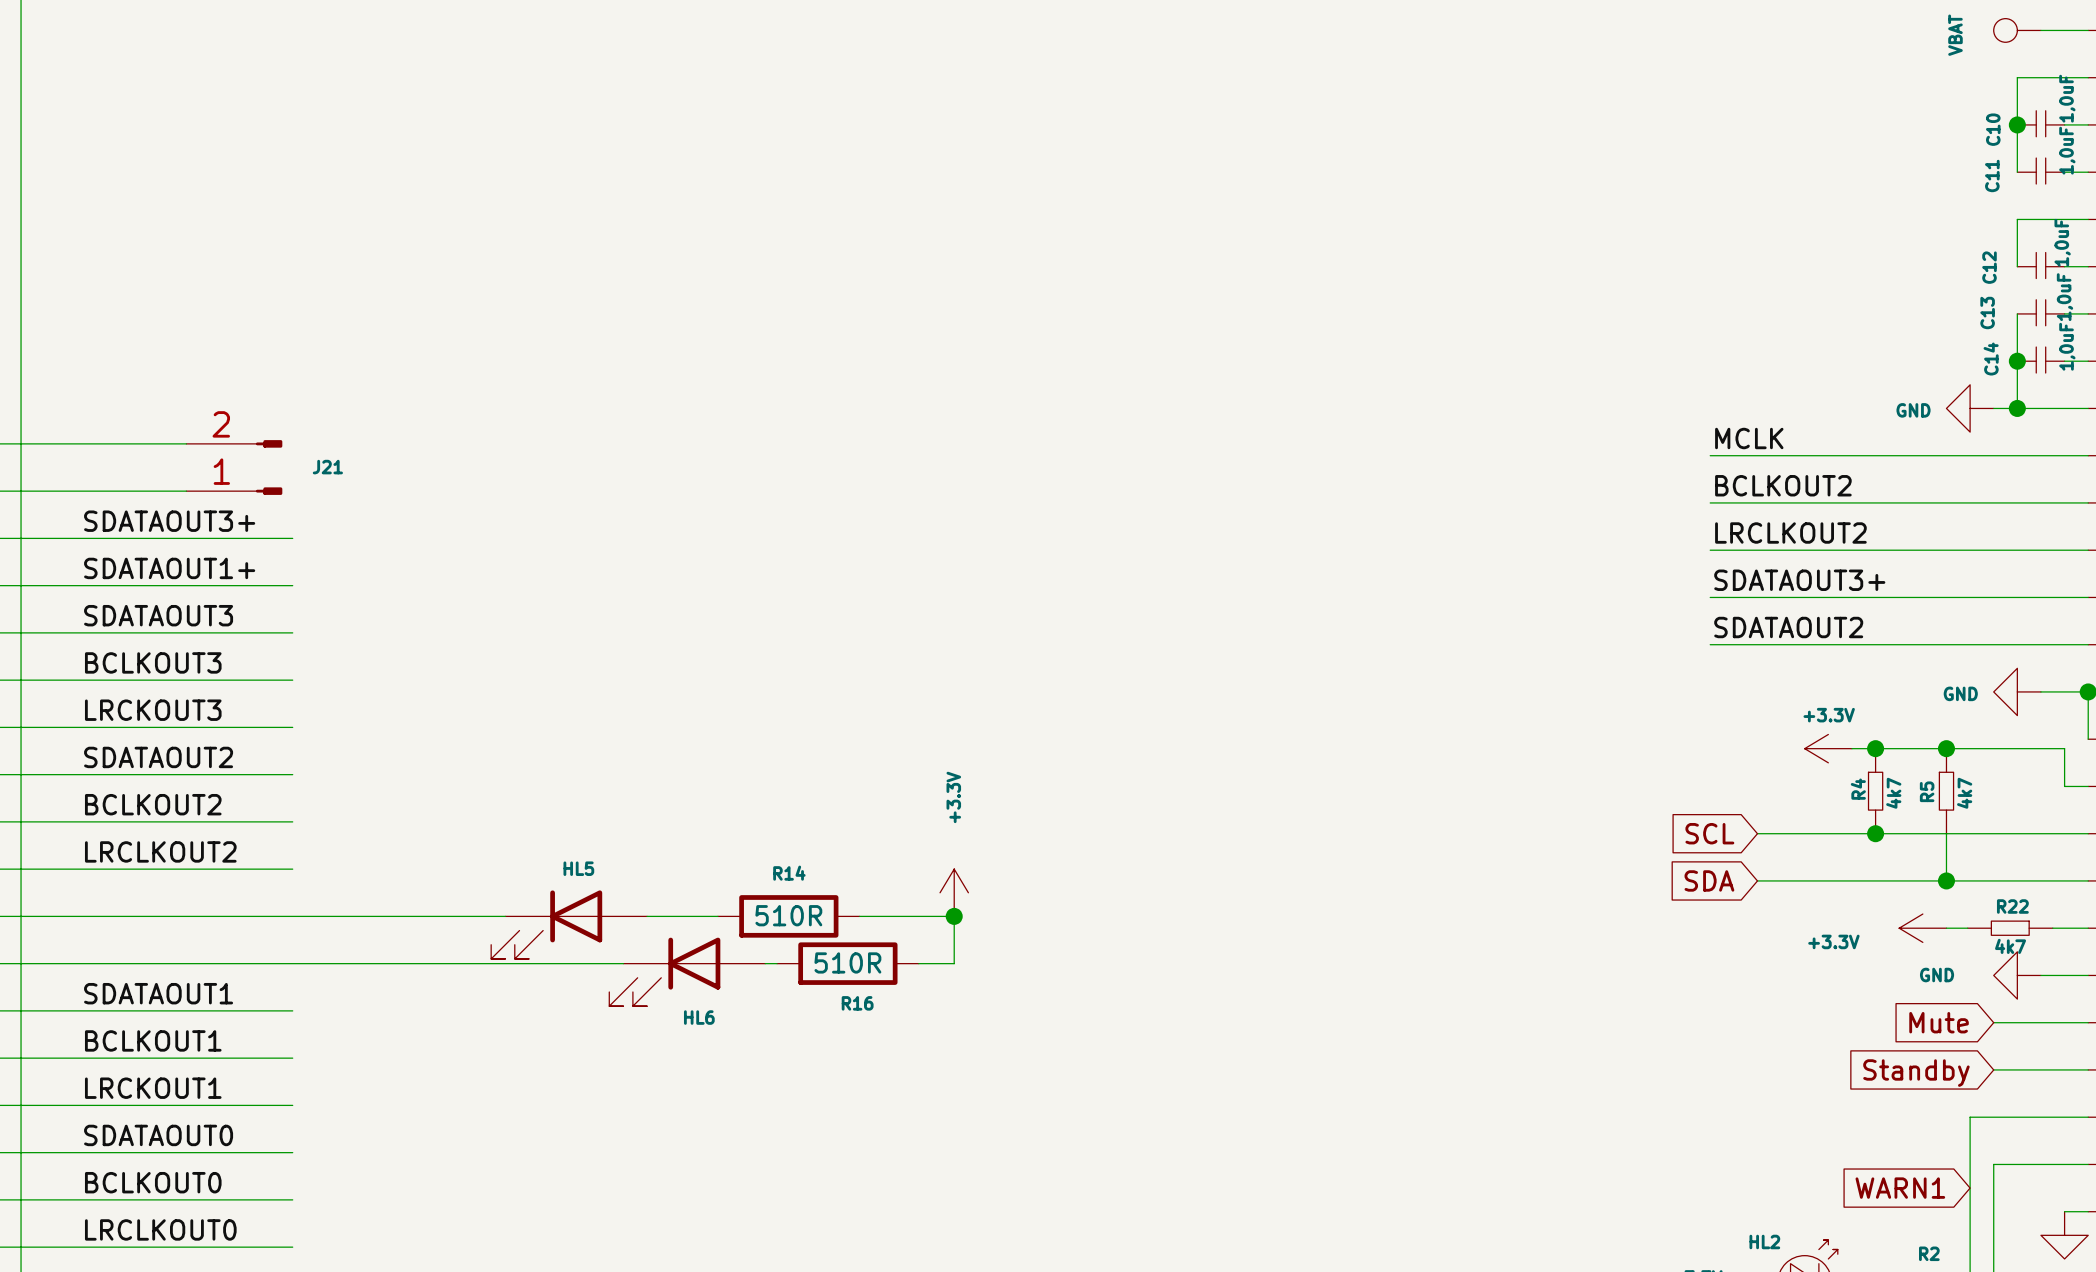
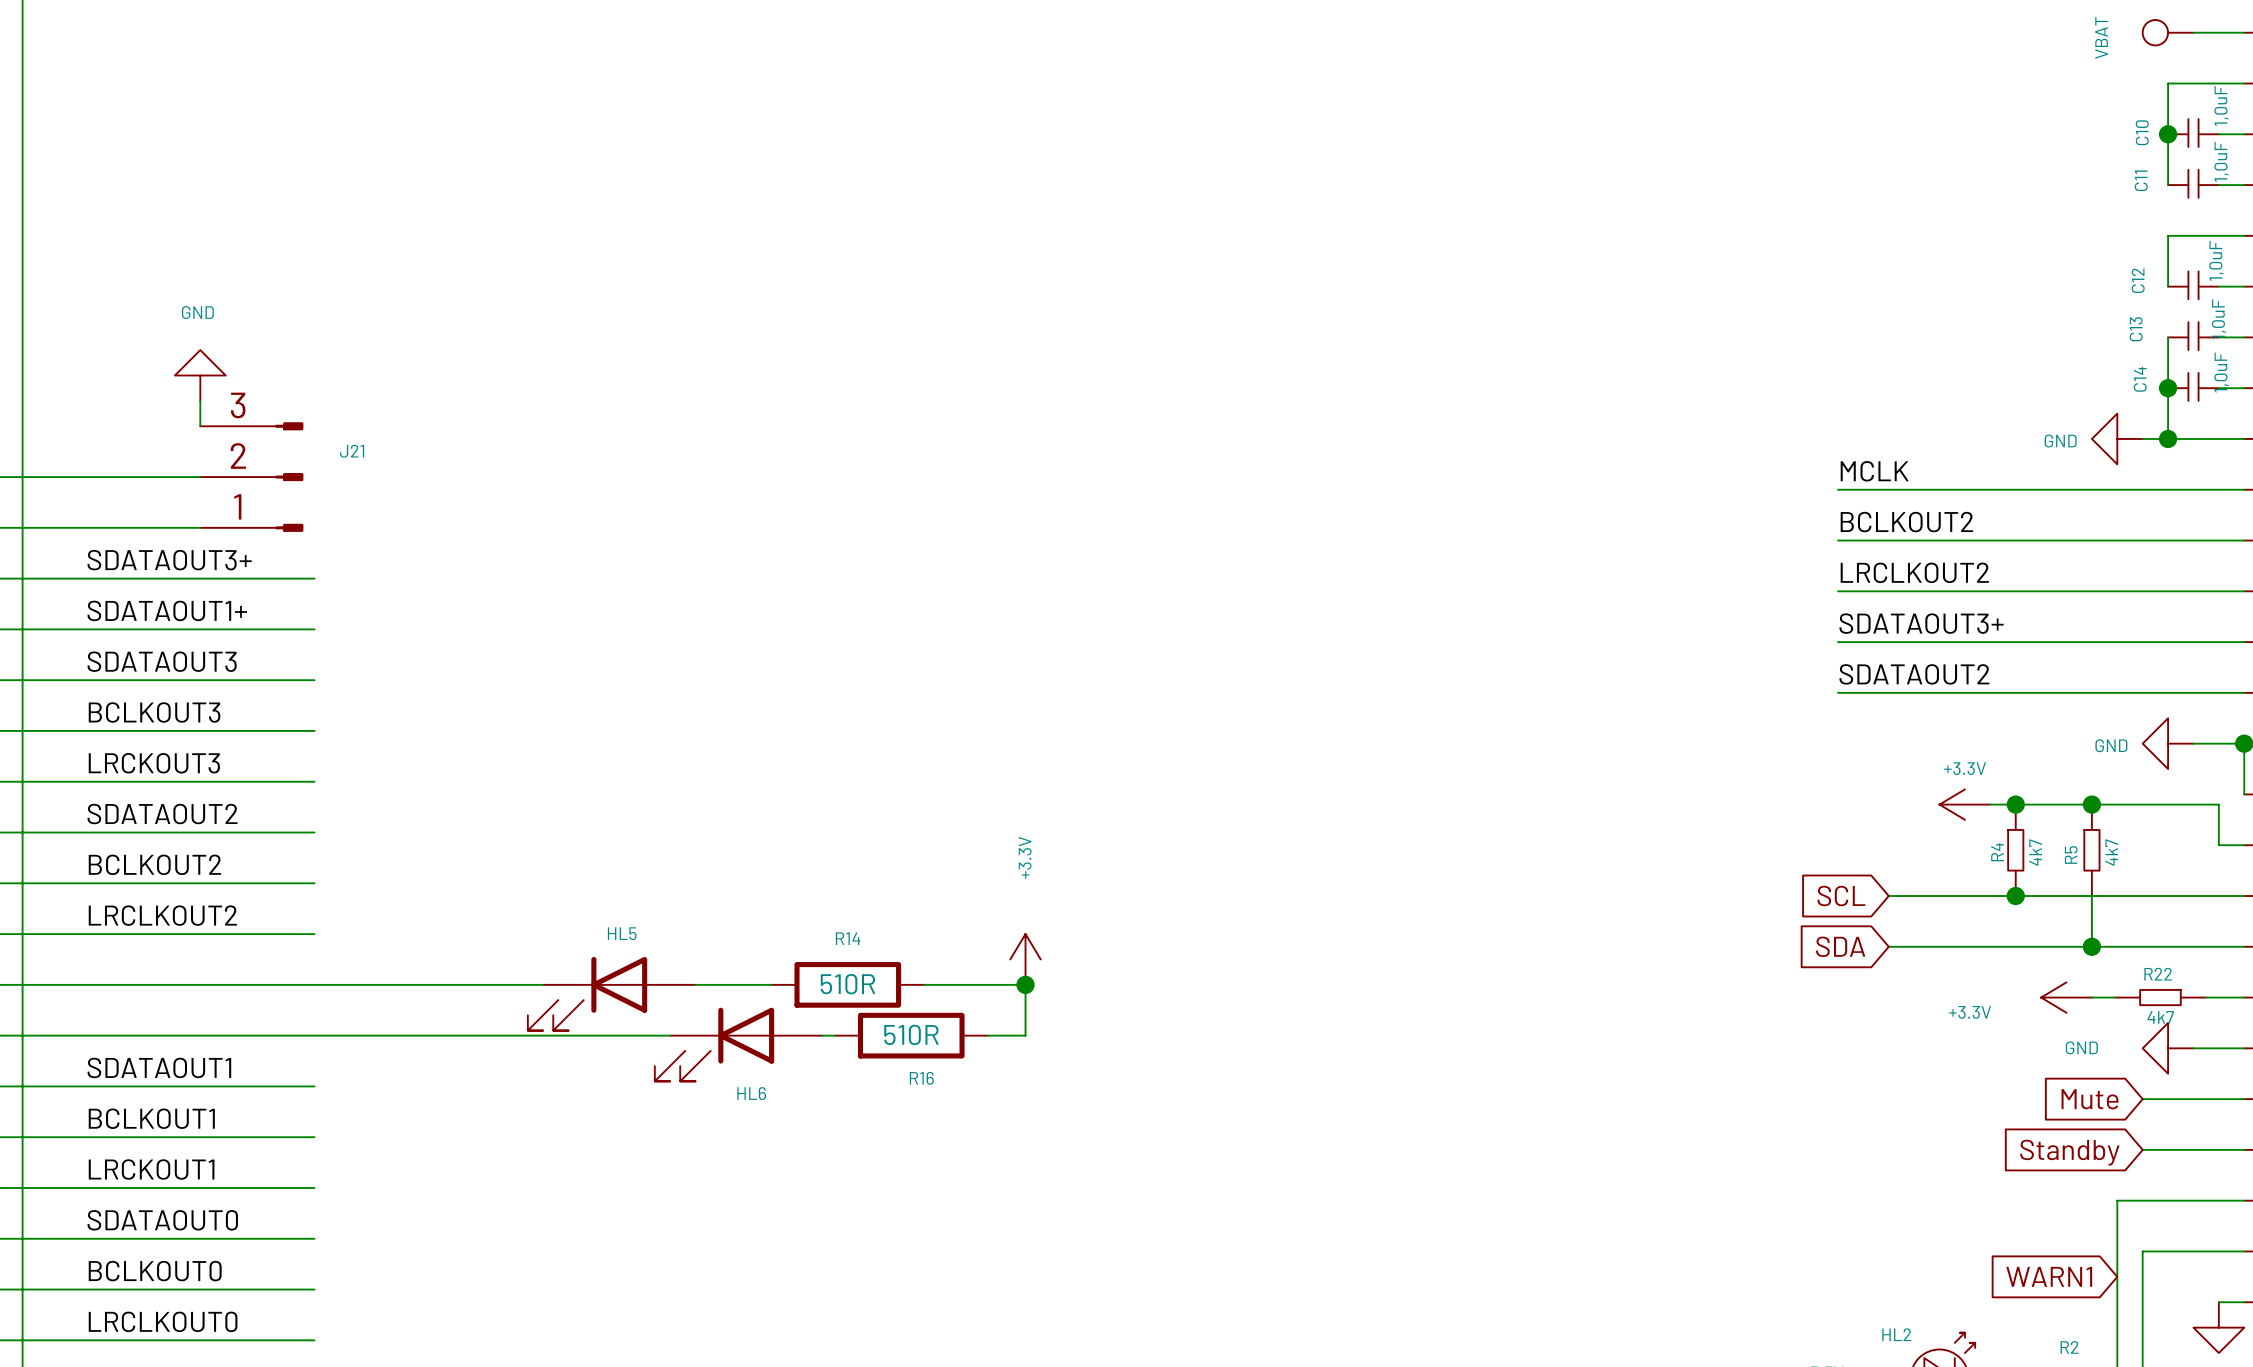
power symbol: none -> GND (200, 375)
wire: none -> (200, 400) (200, 426)
J21 symbol: [186, 440, 283, 495] -> [200, 422, 304, 532]

